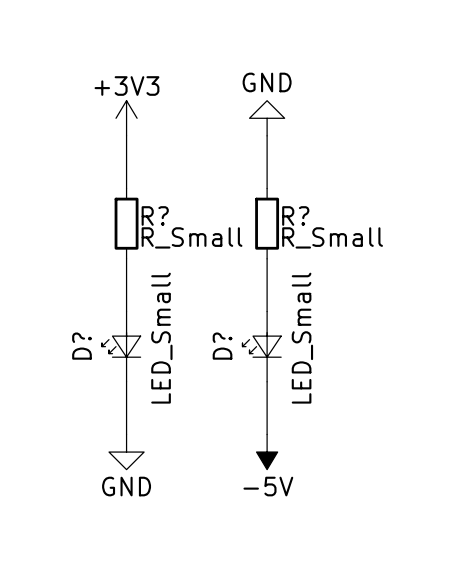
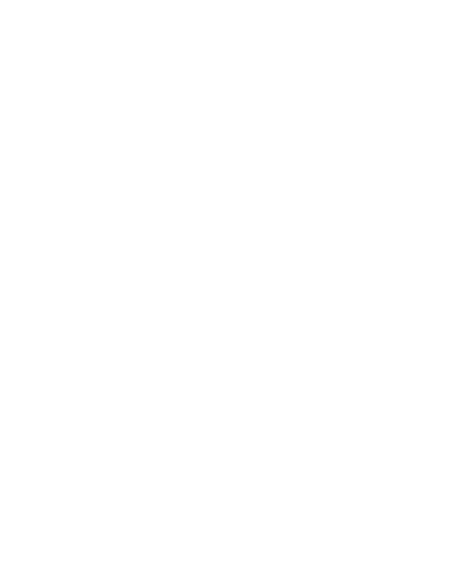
power symbol: +3V3 (126, 118) -> none
power symbol: GND (267, 118) -> none
wire: (126, 135) (126, 188) -> none
wire: (267, 135) (267, 188) -> none
R?: R_Small (126, 223) -> none
R?: R_Small (267, 223) -> none
wire: (126, 258) (126, 311) -> none
wire: (267, 258) (267, 311) -> none
D?: LED_Small (121, 346) -> none
D?: LED_Small (261, 346) -> none
wire: (126, 381) (126, 434) -> none
wire: (267, 381) (267, 434) -> none
power symbol: GND (126, 452) -> none
power symbol: -5V (267, 452) -> none

